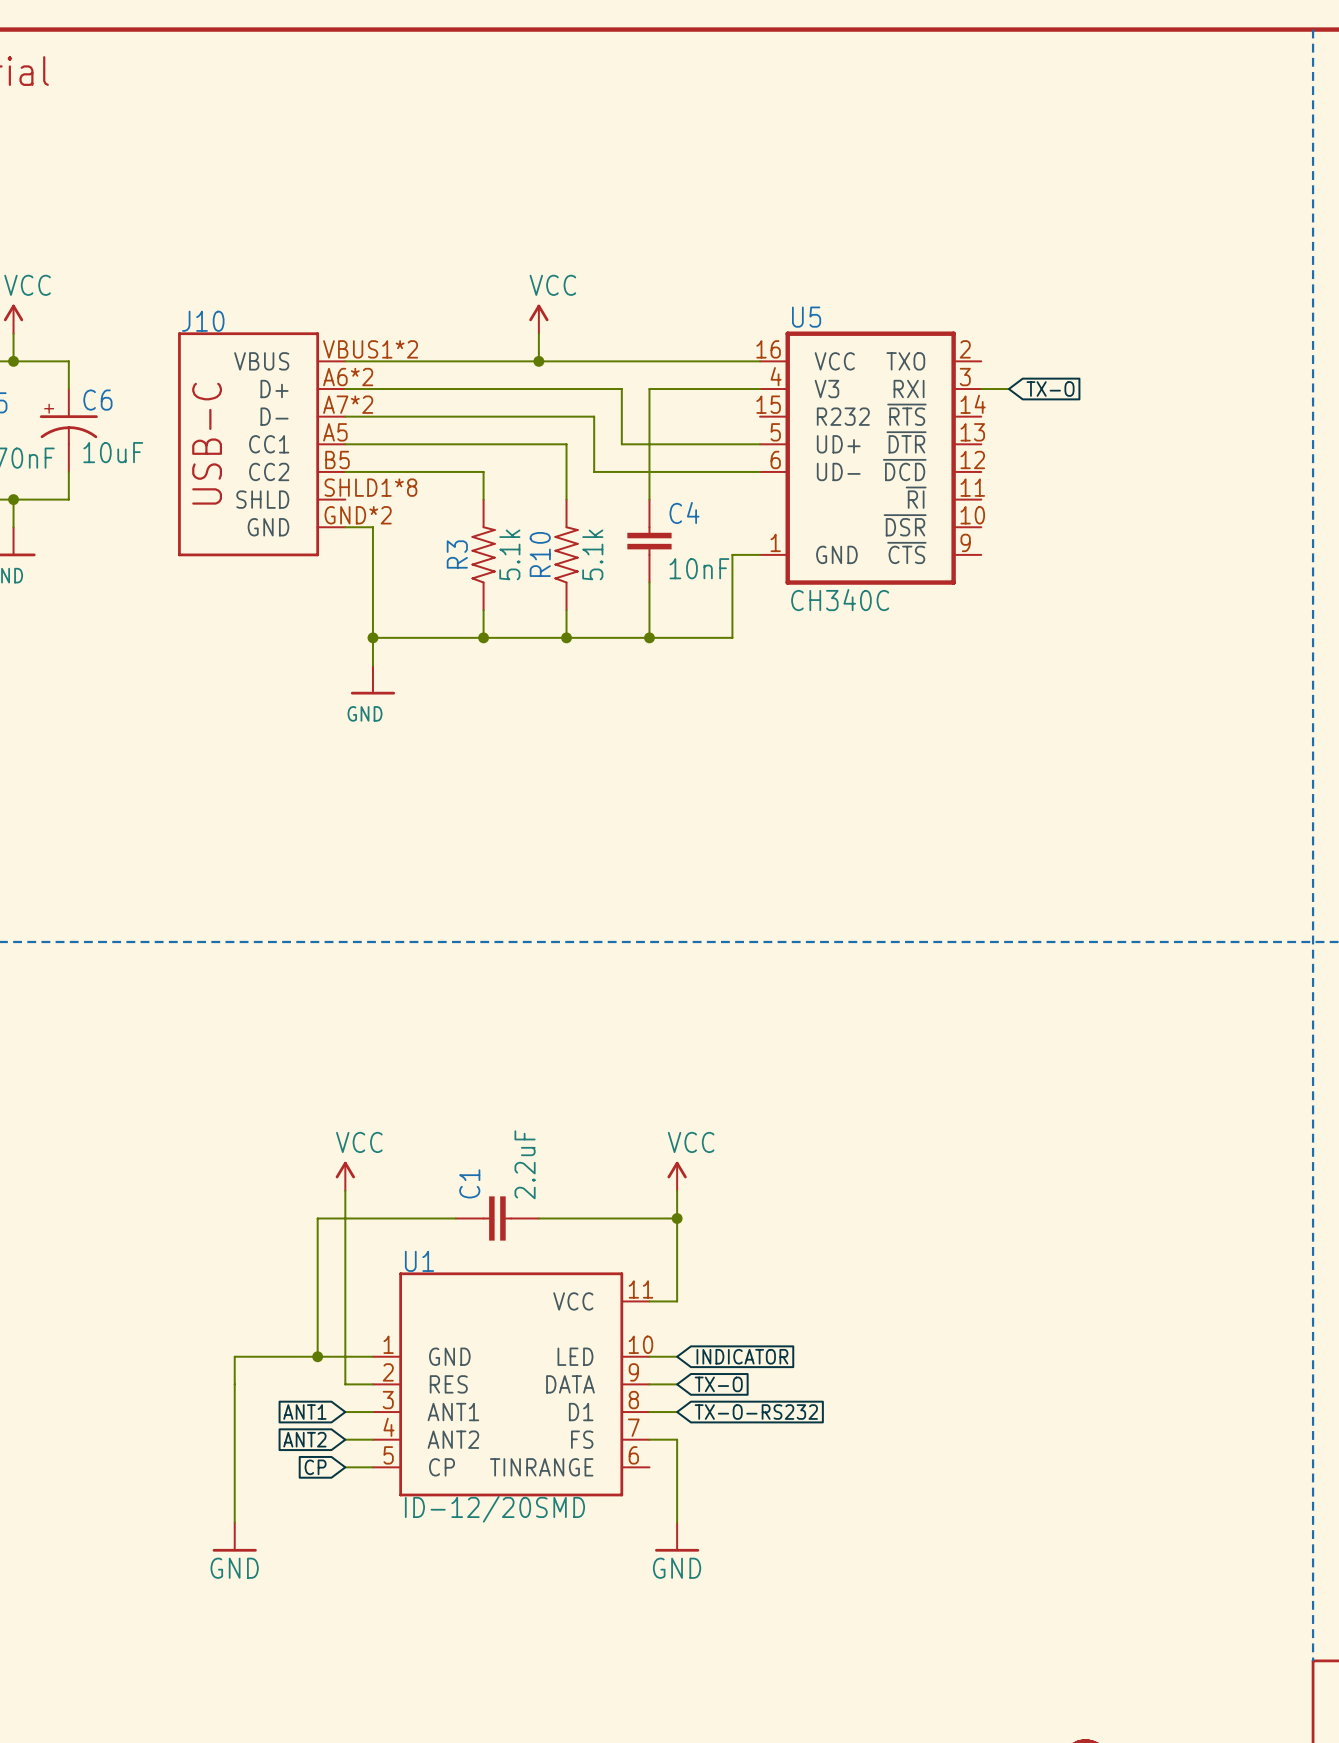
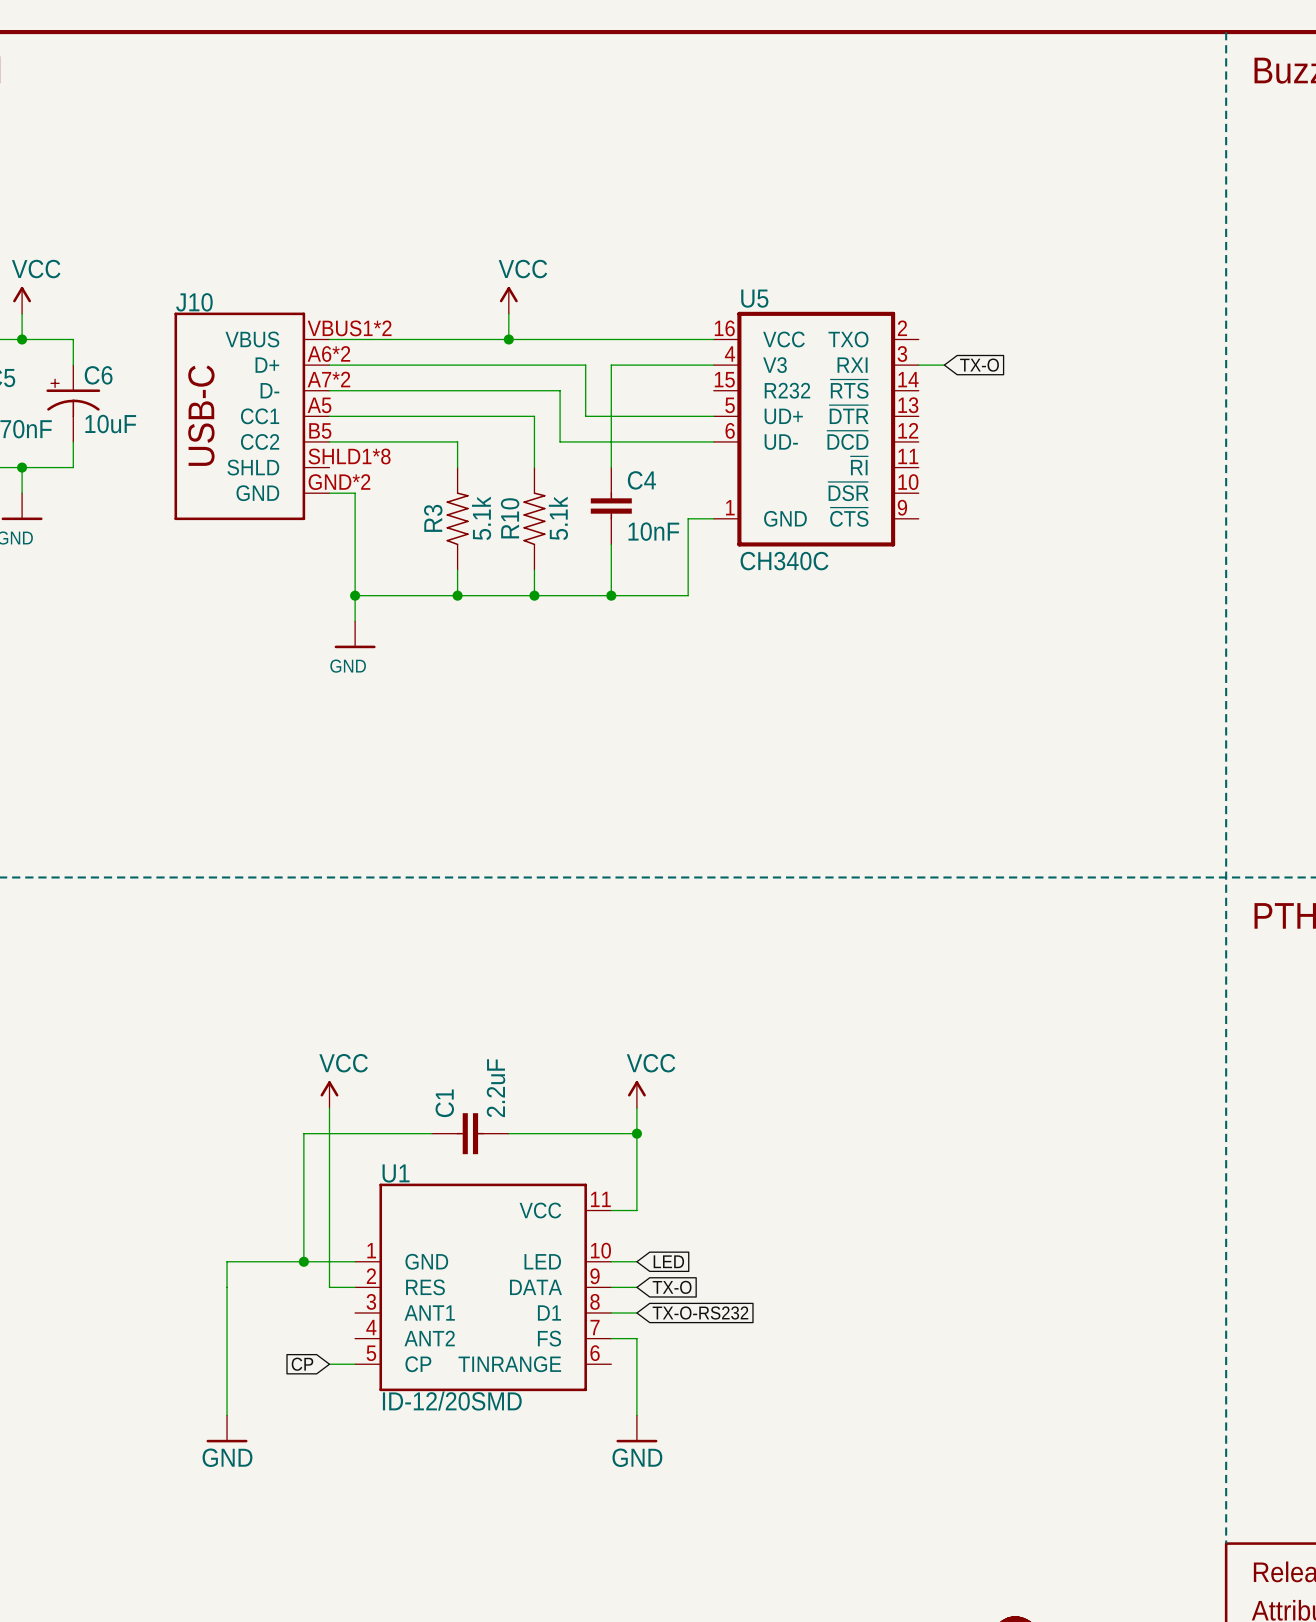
global label: INDICATOR (742, 1356) -> LED (668, 1261)
global label: ANT1 (304, 1412) -> none
wire: (345, 1412) (372, 1412) -> none
global label: ANT2 (304, 1439) -> none
wire: (345, 1439) (372, 1439) -> none

